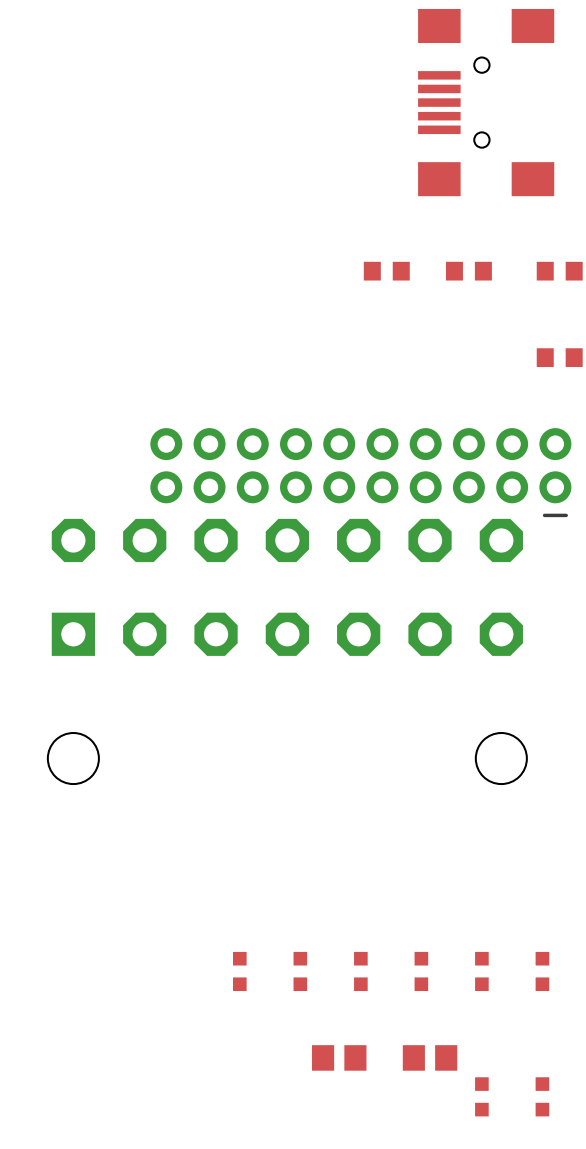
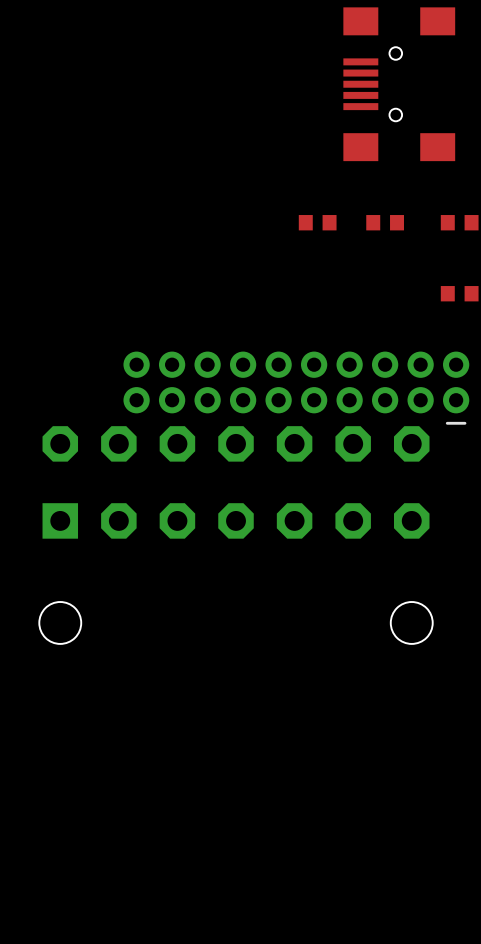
part: (239, 971) -> none
part: (300, 971) -> none
part: (360, 971) -> none
part: (421, 971) -> none
part: (481, 971) -> none
part: (542, 971) -> none
part: (339, 1057) -> none
part: (430, 1057) -> none
part: (481, 1096) -> none
part: (542, 1096) -> none

